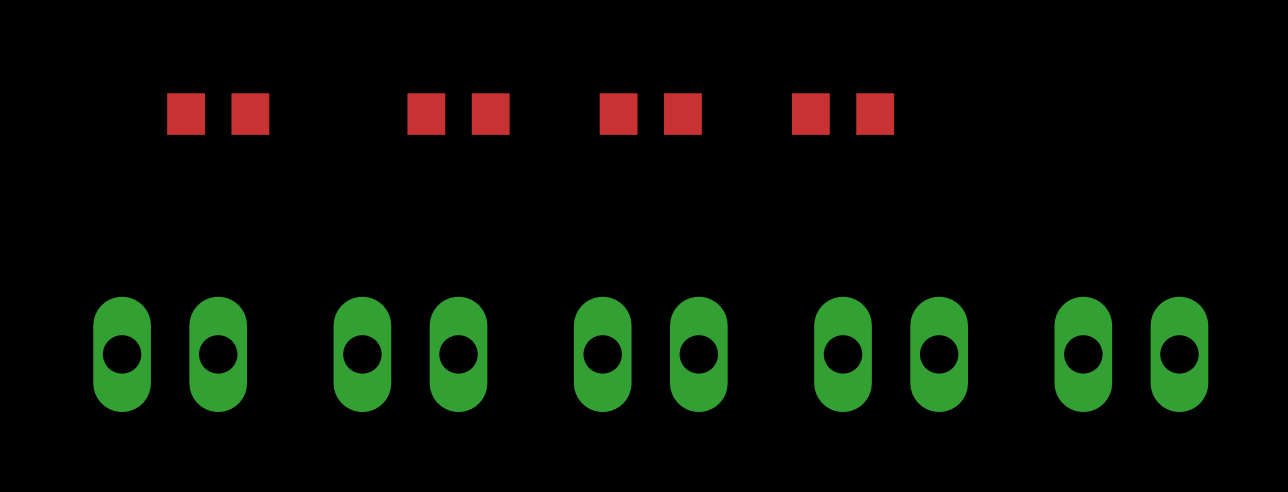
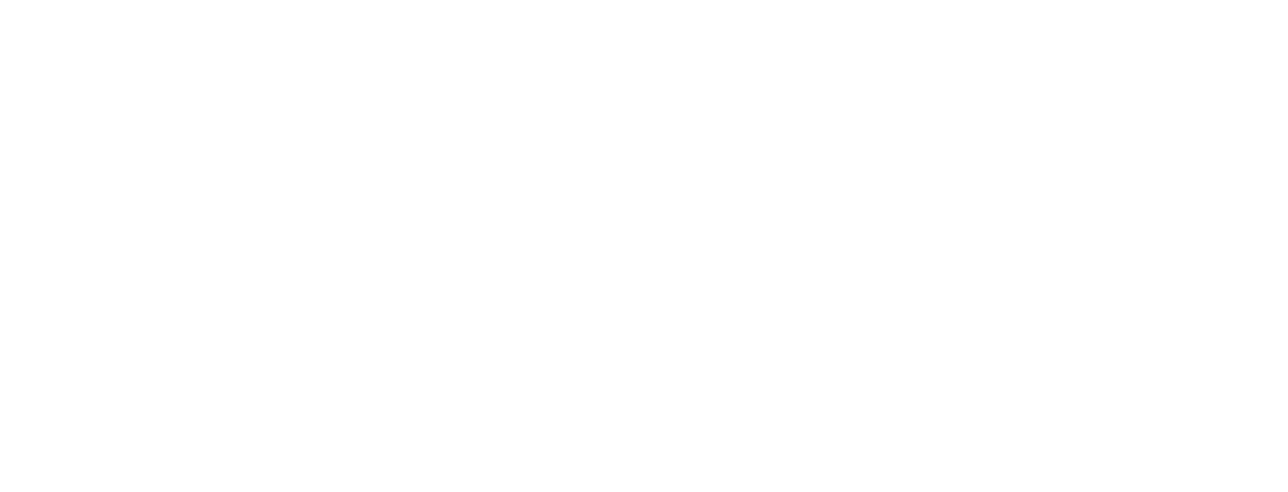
part: (218, 114) -> none
part: (458, 114) -> none
part: (650, 114) -> none
part: (843, 114) -> none
part: (170, 354) -> none
part: (410, 354) -> none
part: (650, 354) -> none
part: (891, 354) -> none
part: (1131, 354) -> none

